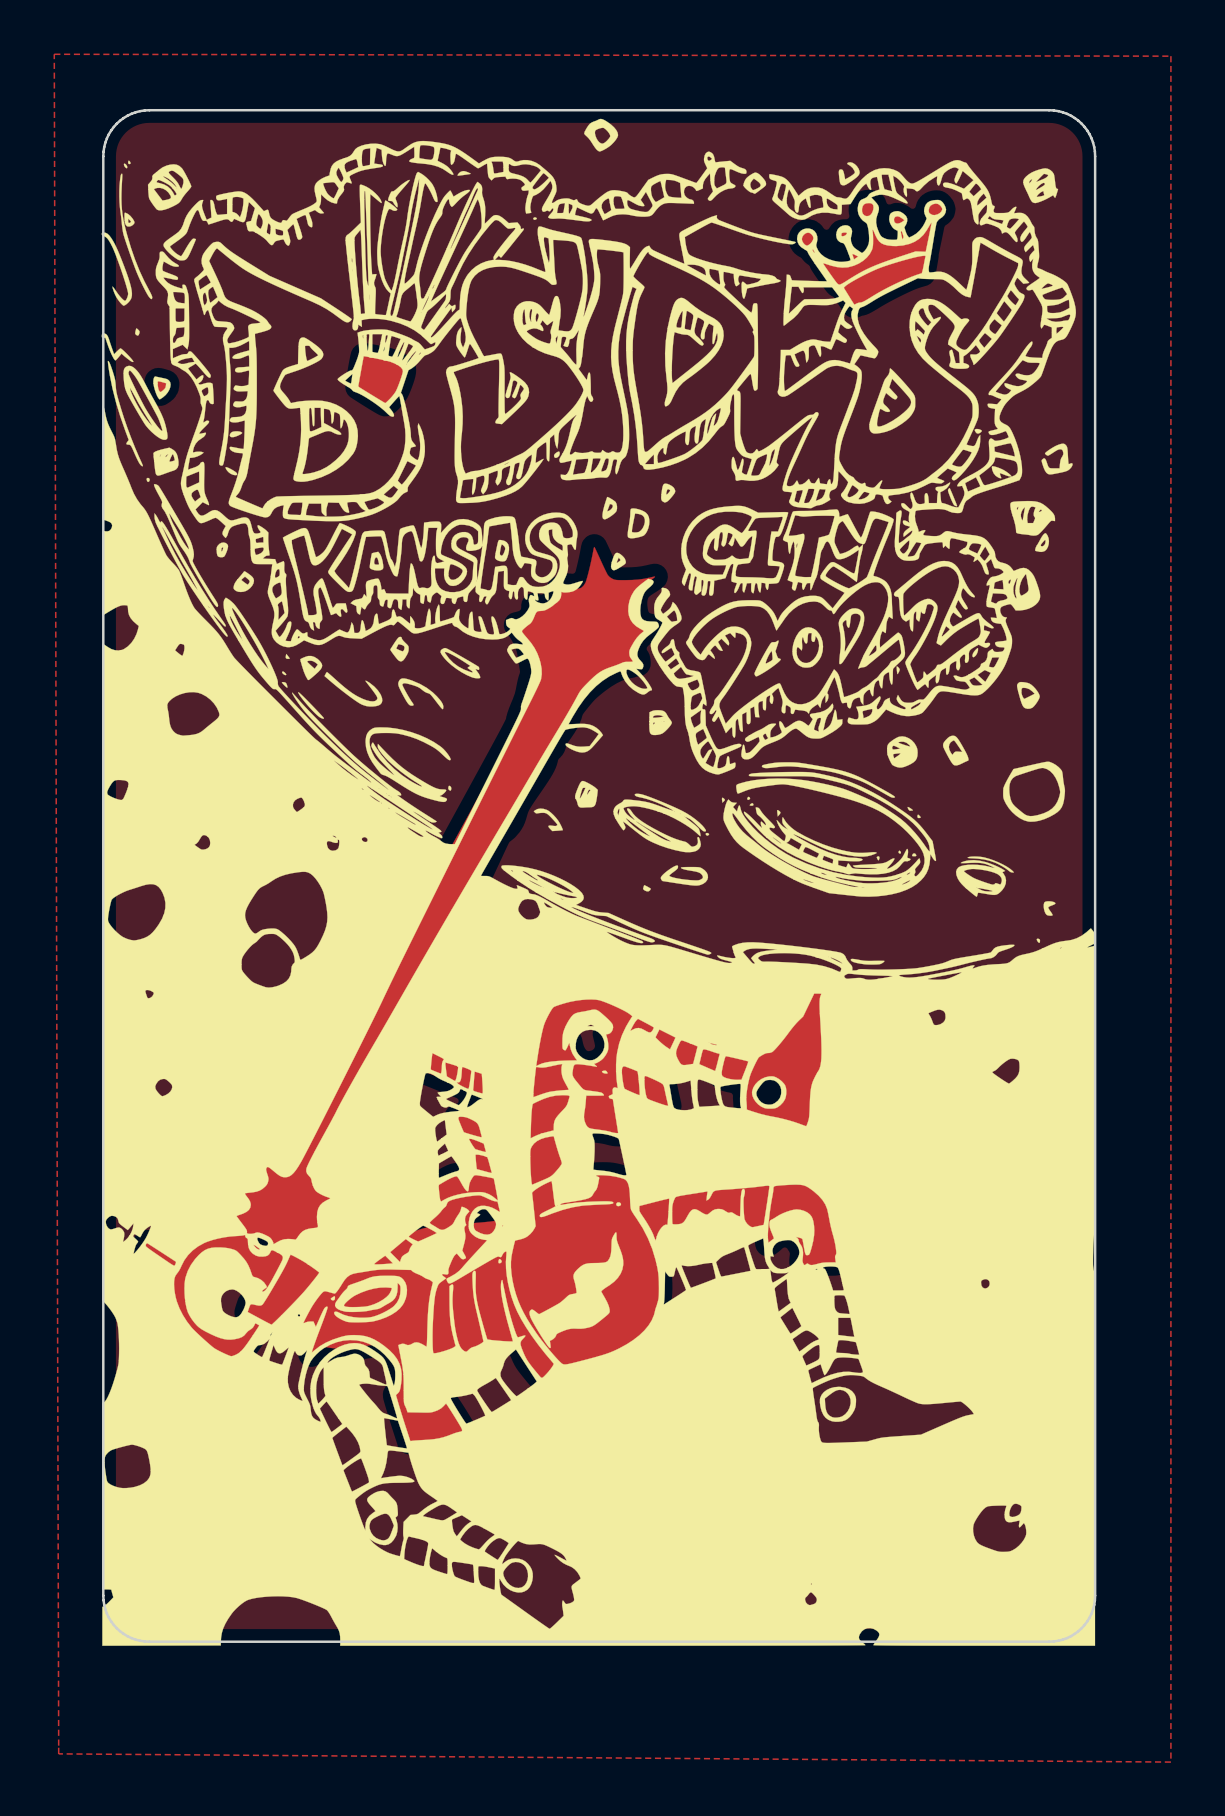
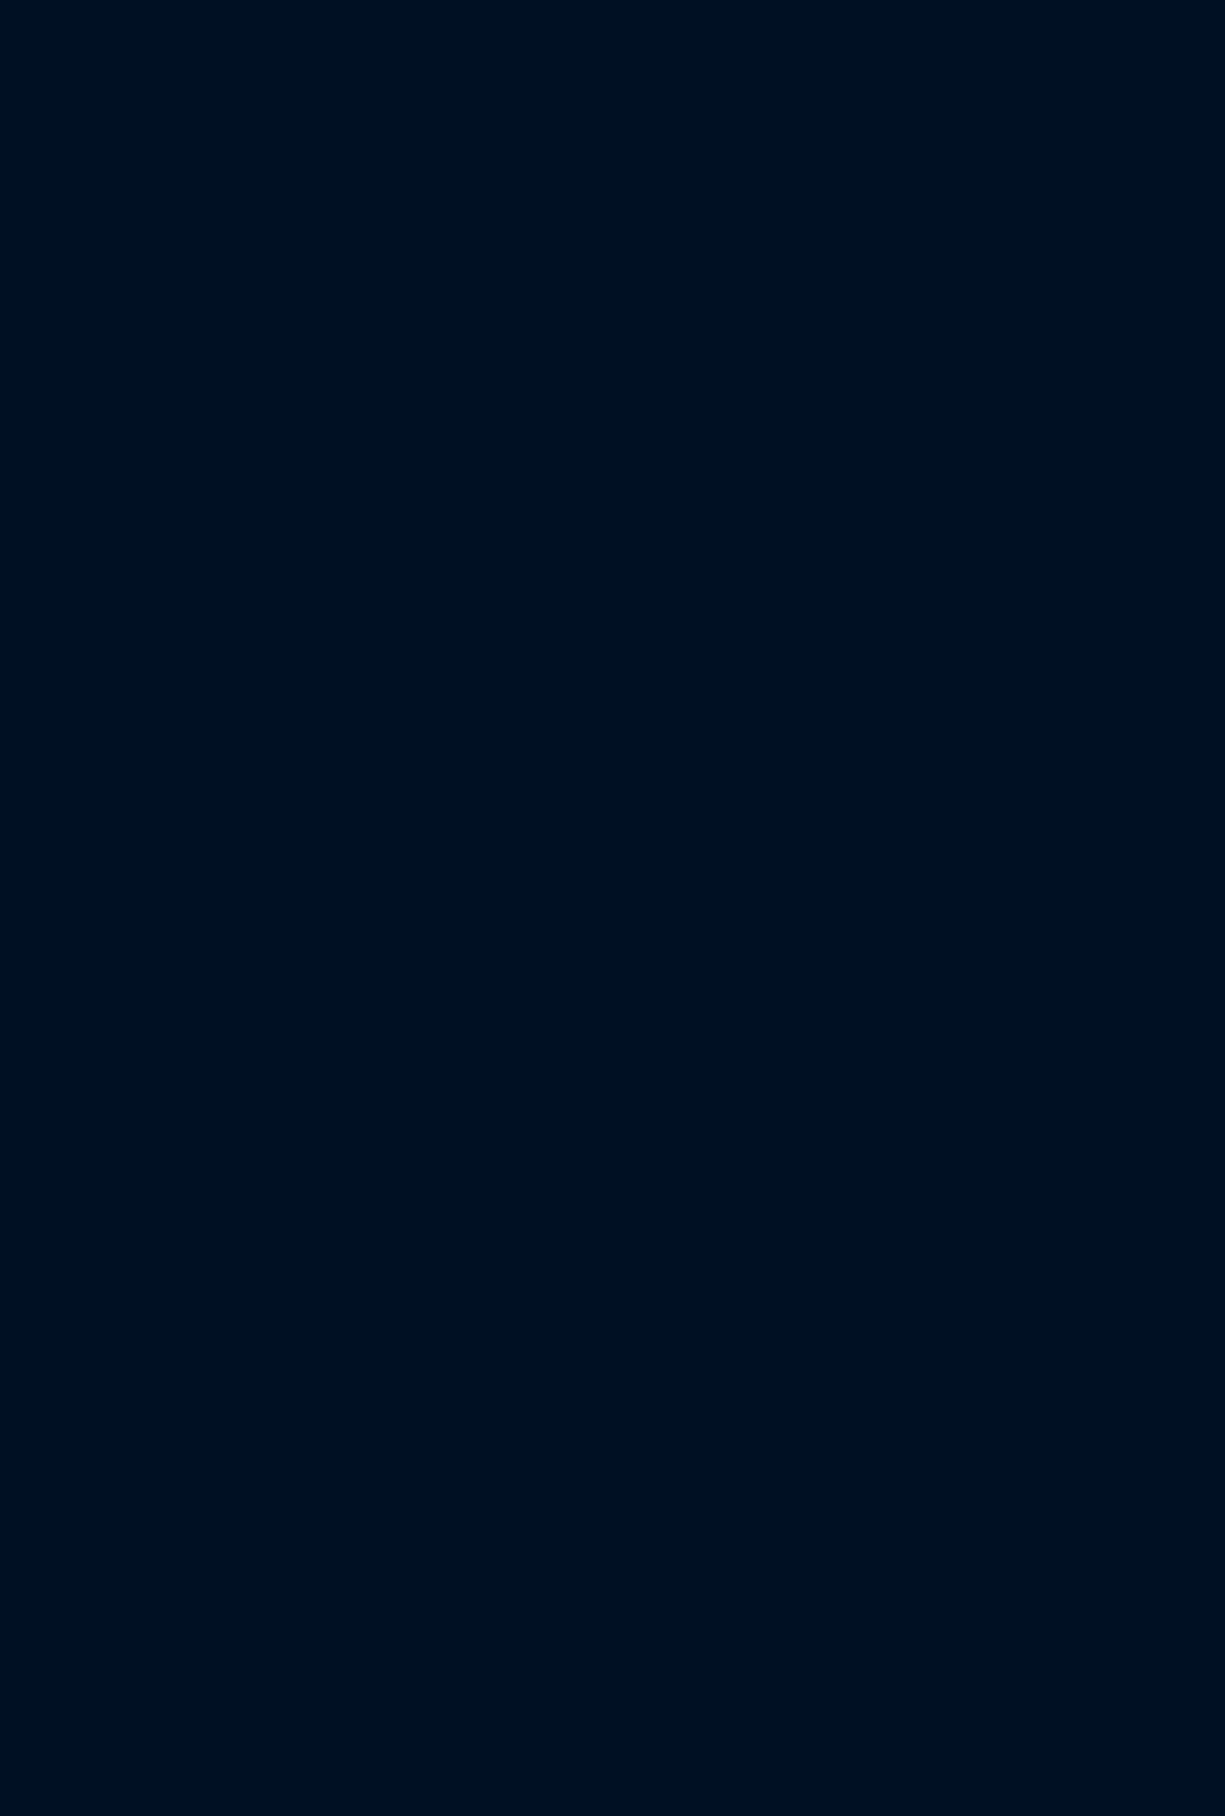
zone outline: (54, 54) (58, 1753) (1170, 1762) (1170, 56) (54, 54) -> none
board edge: (149, 110) (131, 113) (116, 123) (106, 138) (103, 156) (103, 1595) (108, 1617) (116, 1628) (127, 1636) (149, 1641) (1049, 1641) (1071, 1636) (1081, 1628) (1089, 1617) (1095, 1595) (1095, 156) (1089, 134) (1081, 123) (1071, 115) (1049, 110) (149, 110) -> none
drawing: [101, 118, 1096, 1646] -> none

